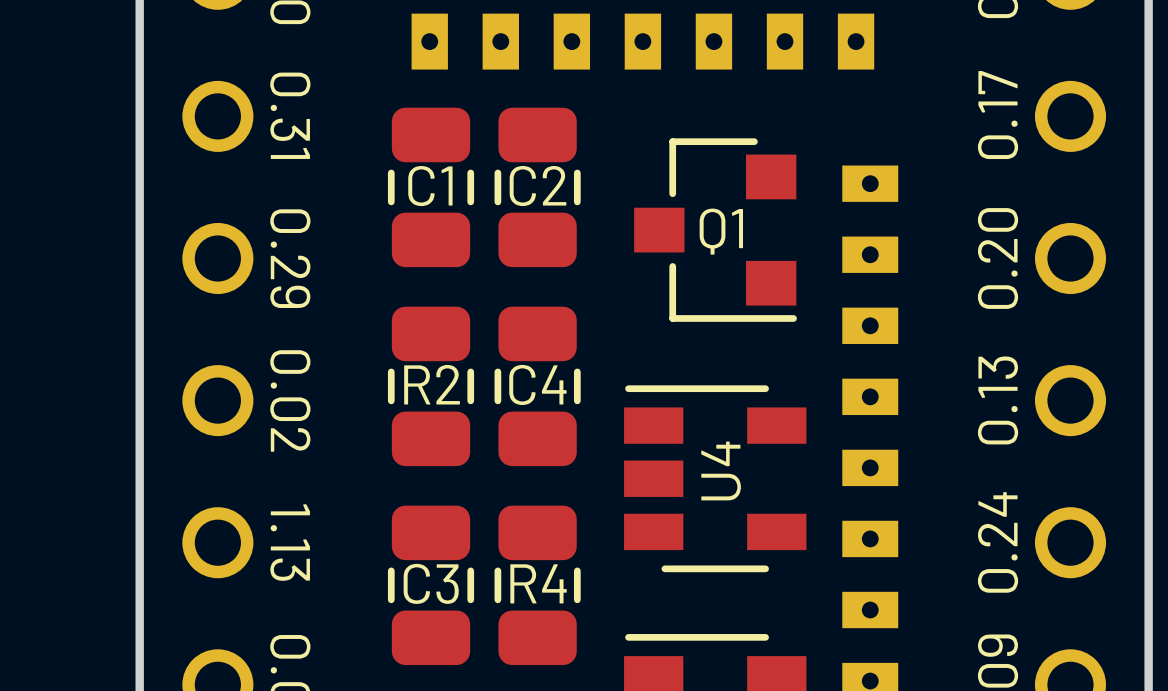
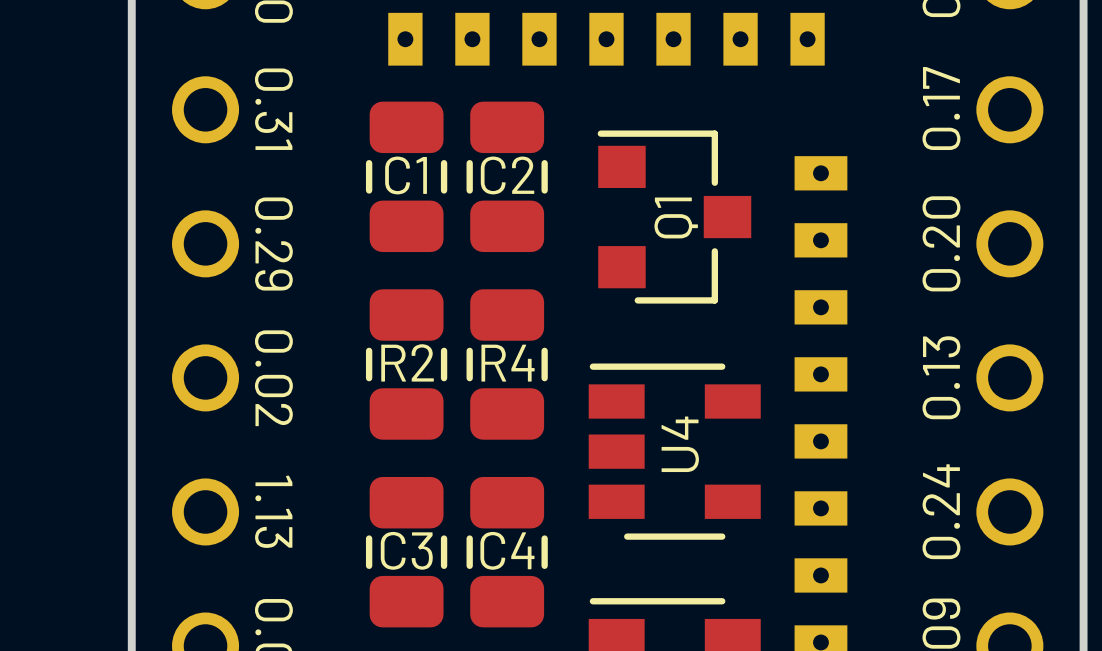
Q1 rotation: 0° (715, 230) -> 180° (674, 217)
C4 name: C4 (537, 384) -> R4 (508, 363)
R4 name: R4 (538, 583) -> C4 (507, 550)

